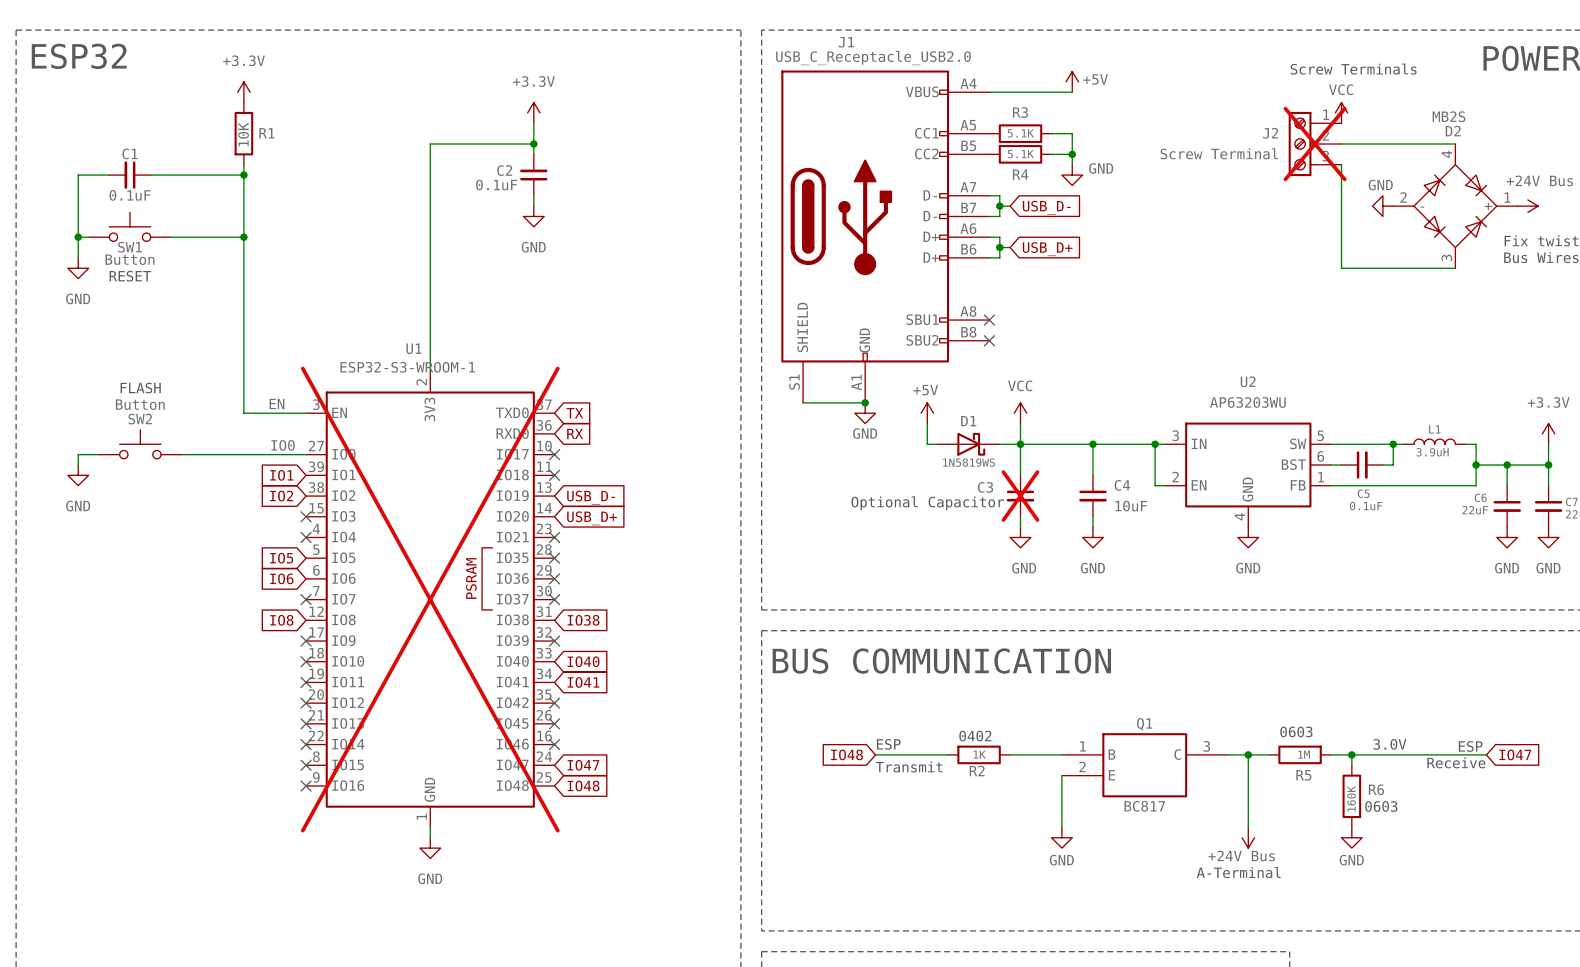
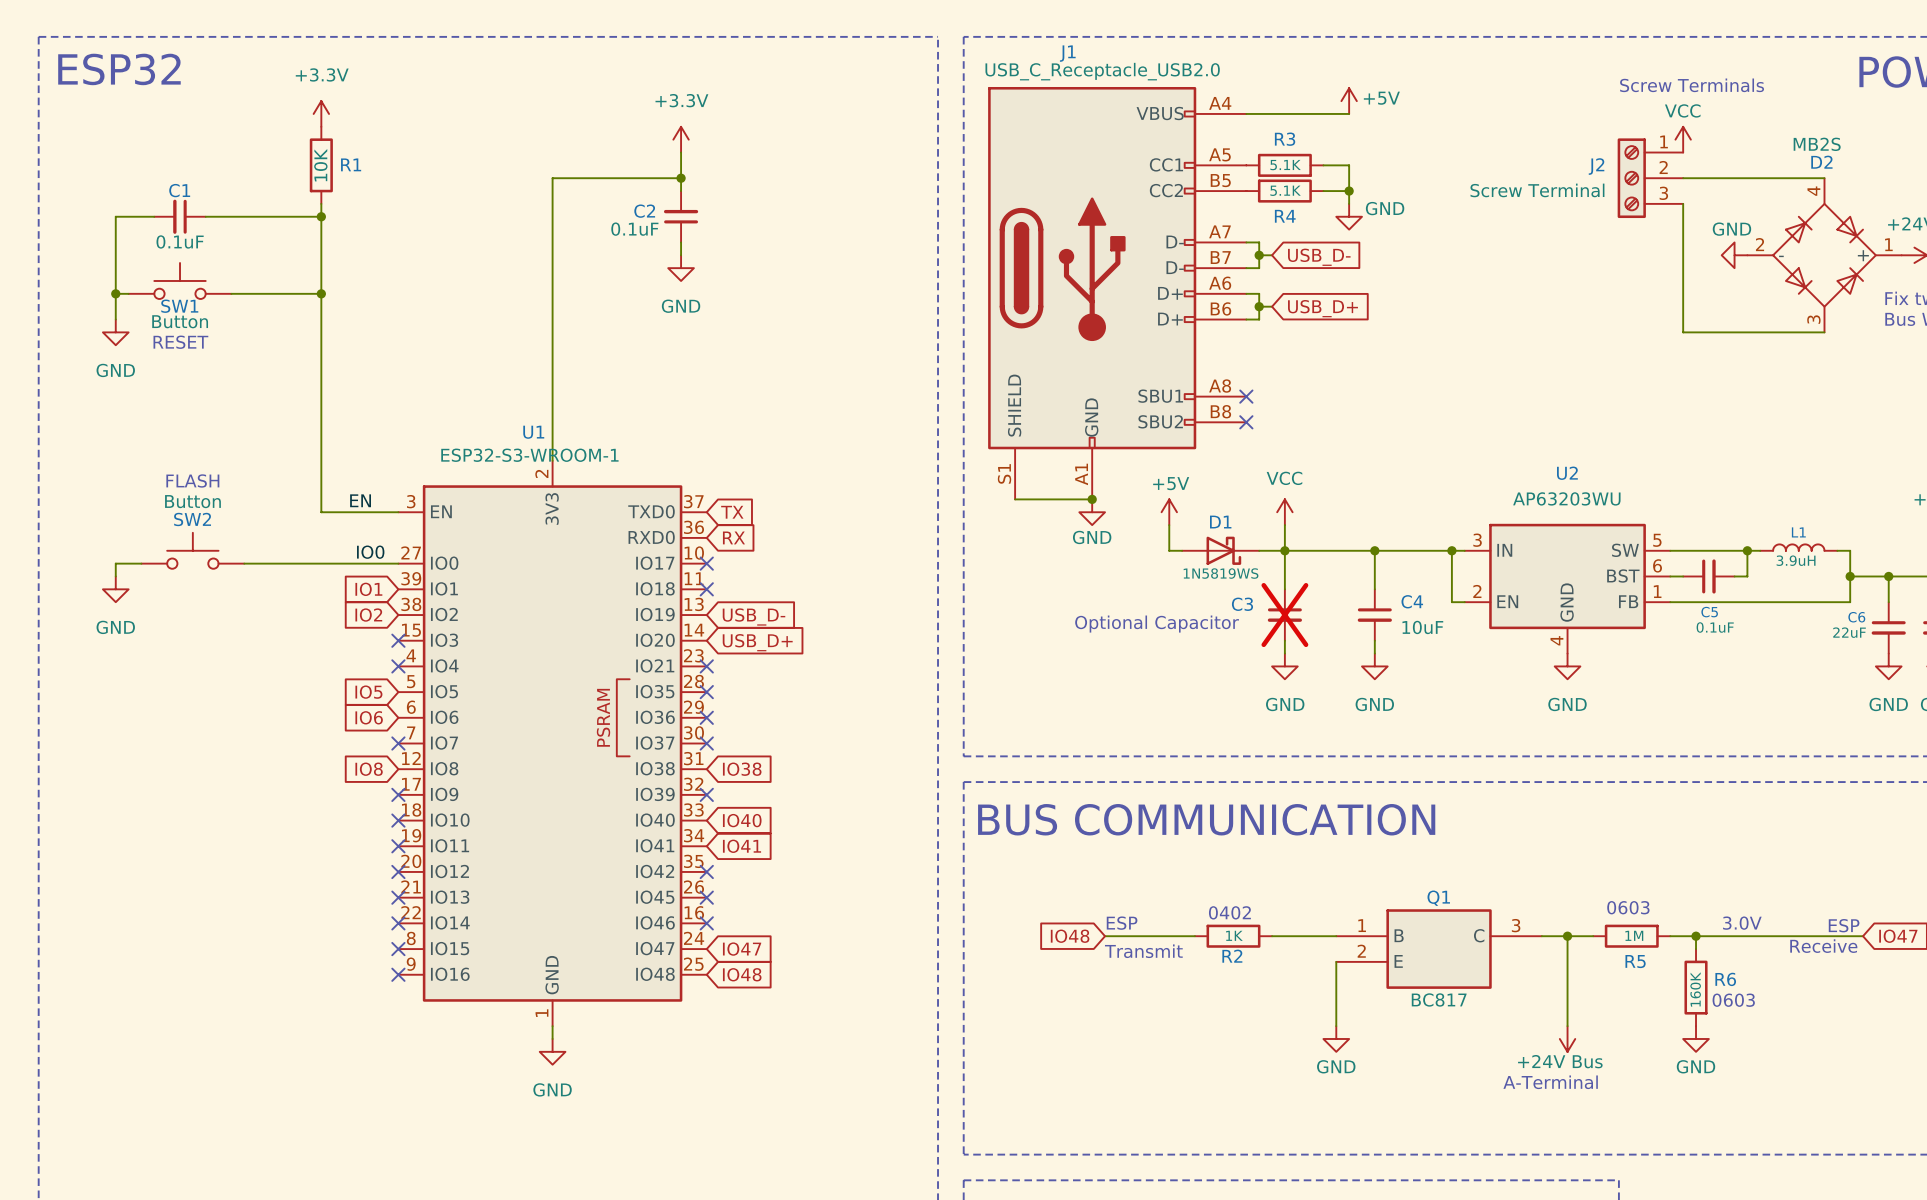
J2 do-not-place cross: (1315, 144) -> none
U1 do-not-place cross: (430, 599) -> none

